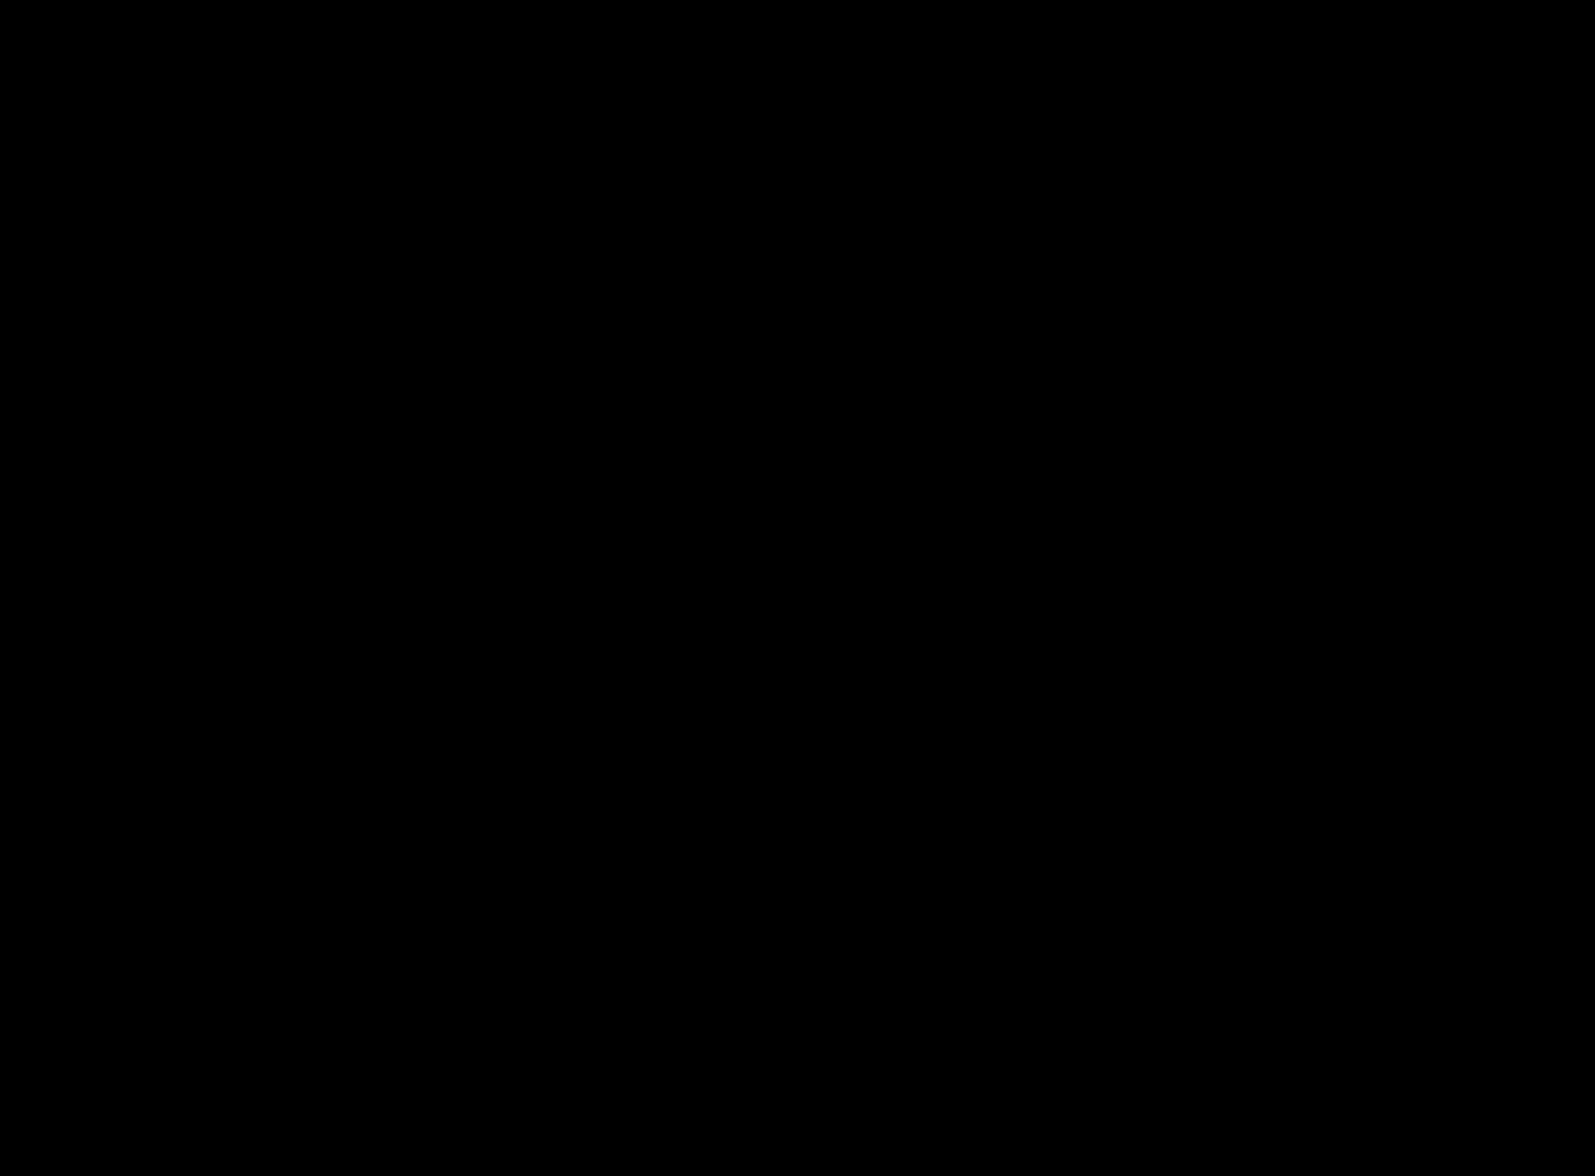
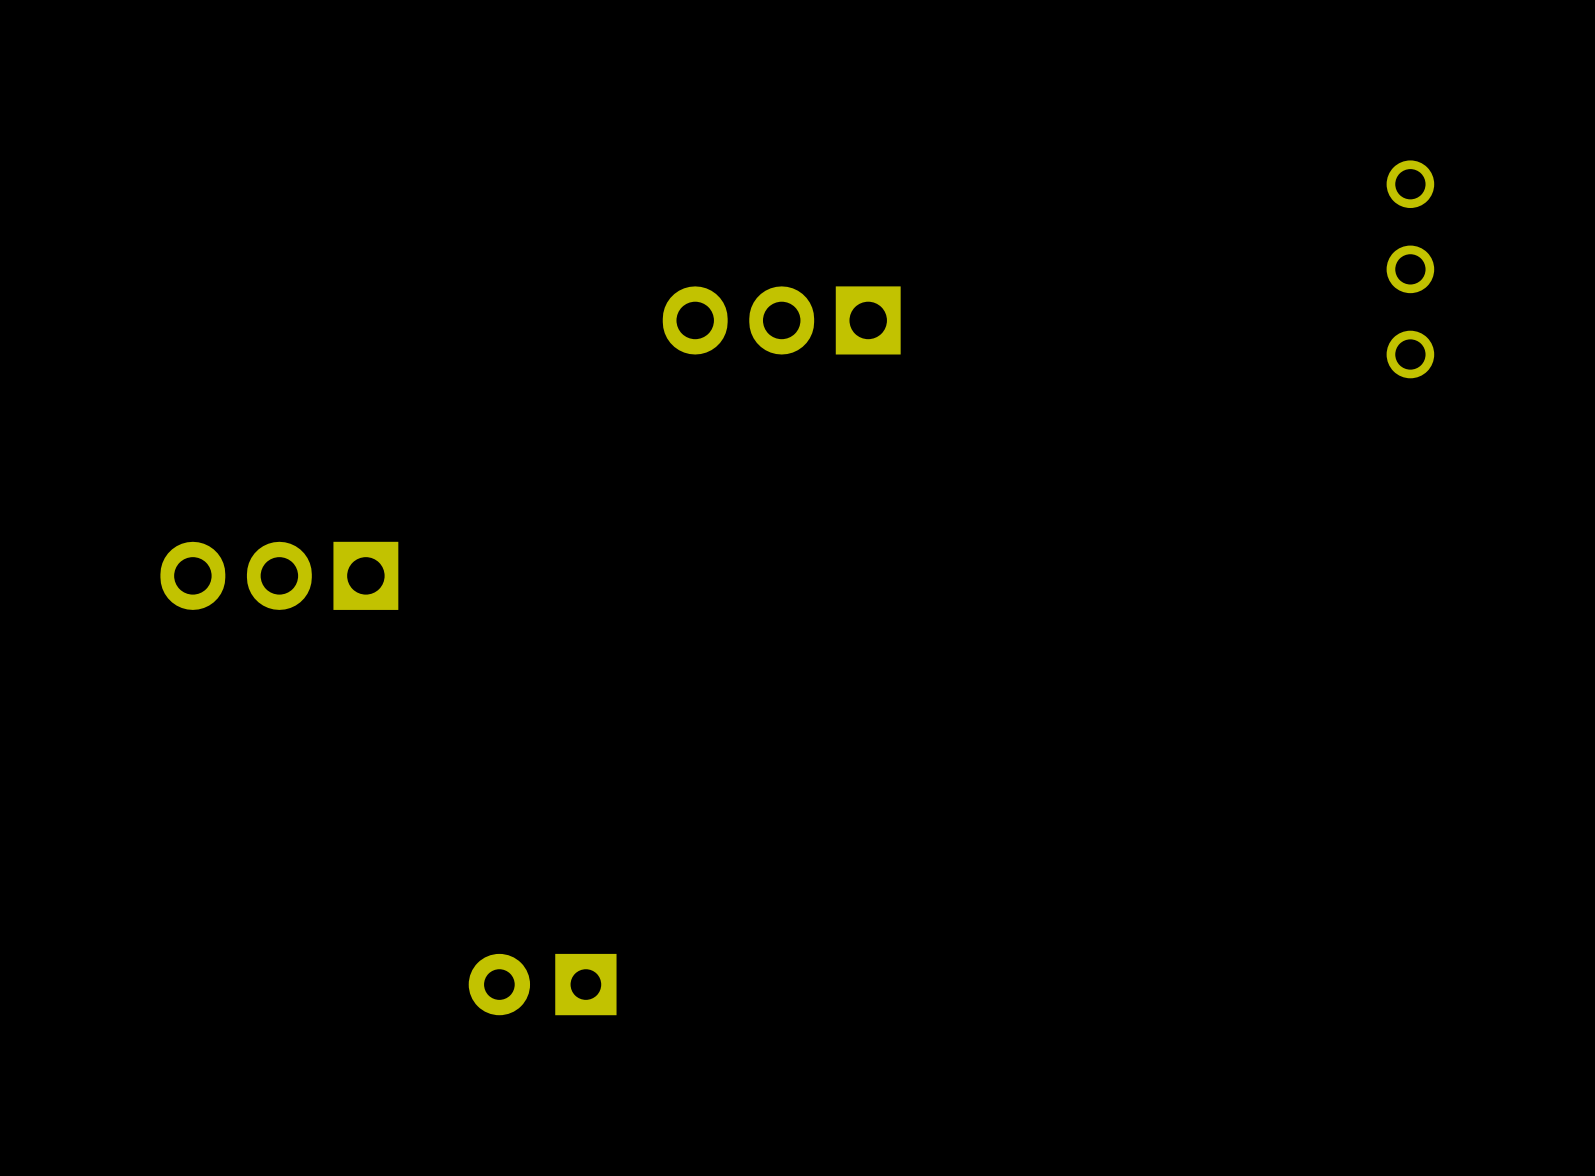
part: none -> (1410, 269)
part: none -> (781, 320)
part: none -> (279, 575)
part: none -> (542, 984)

